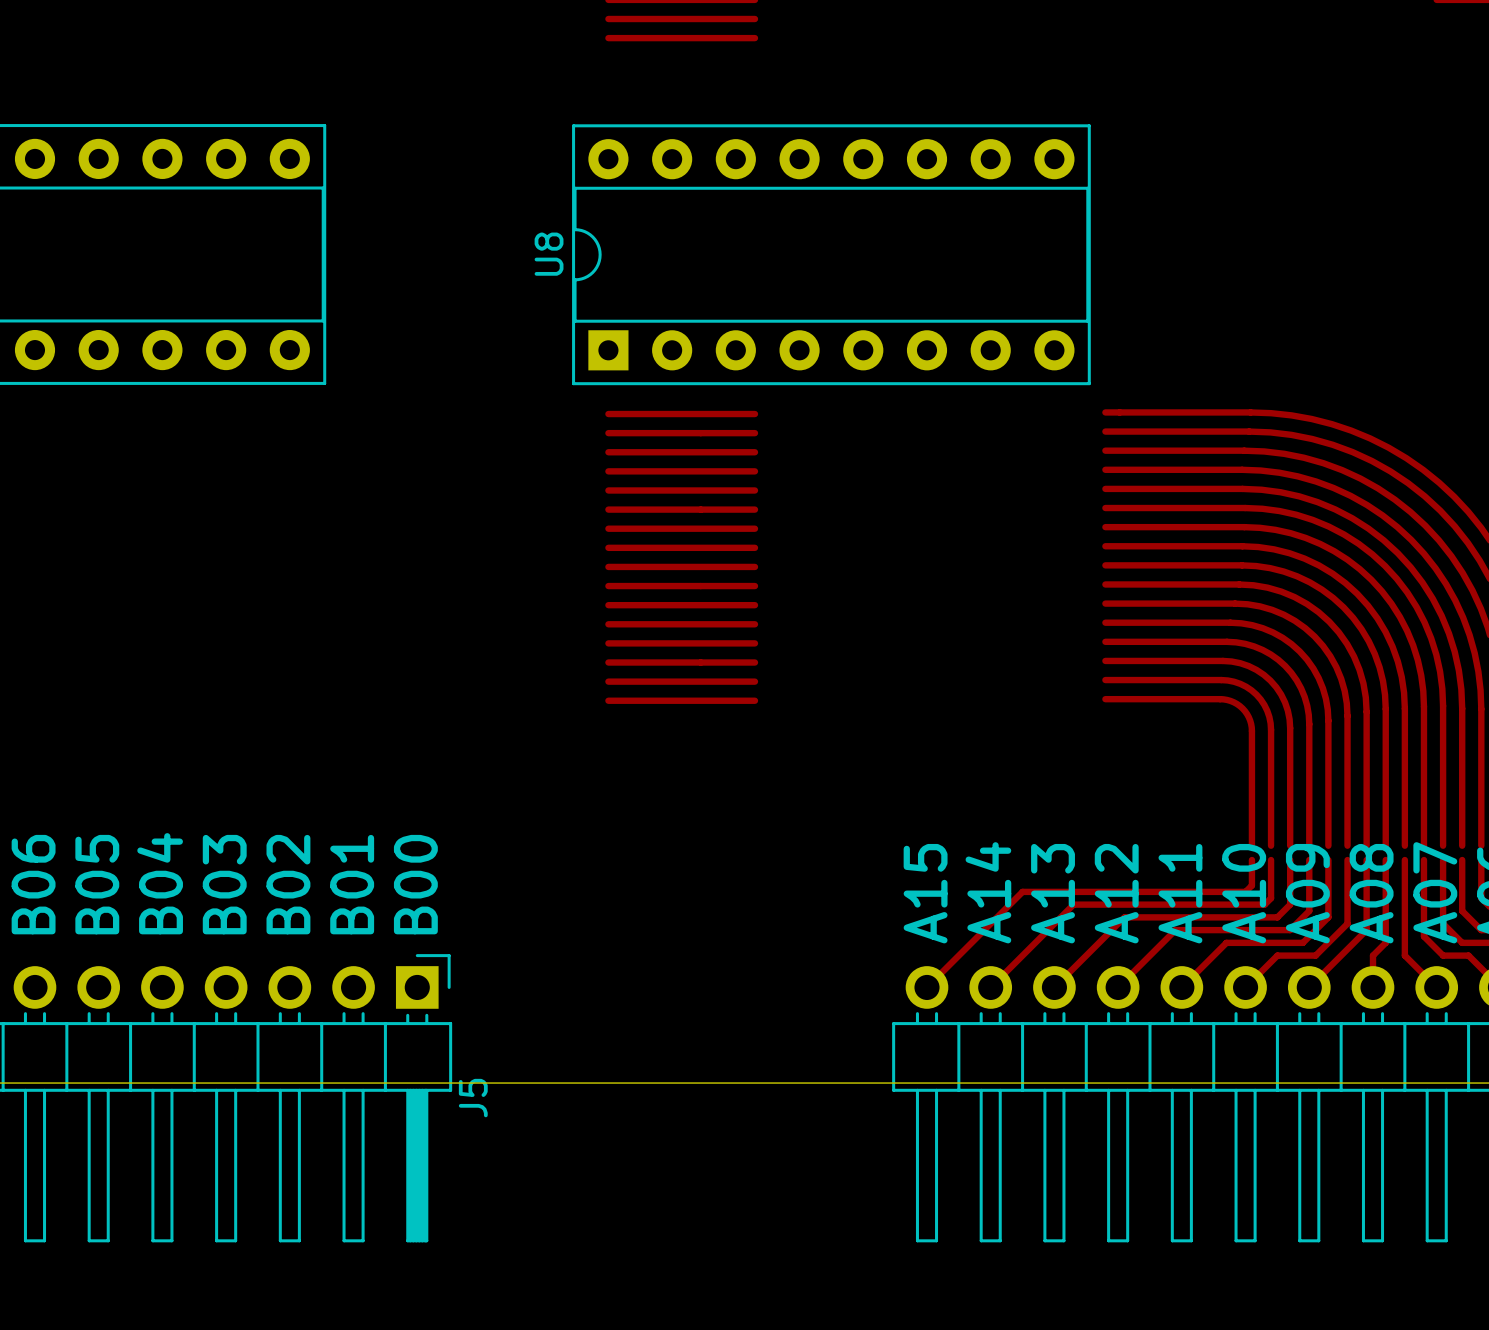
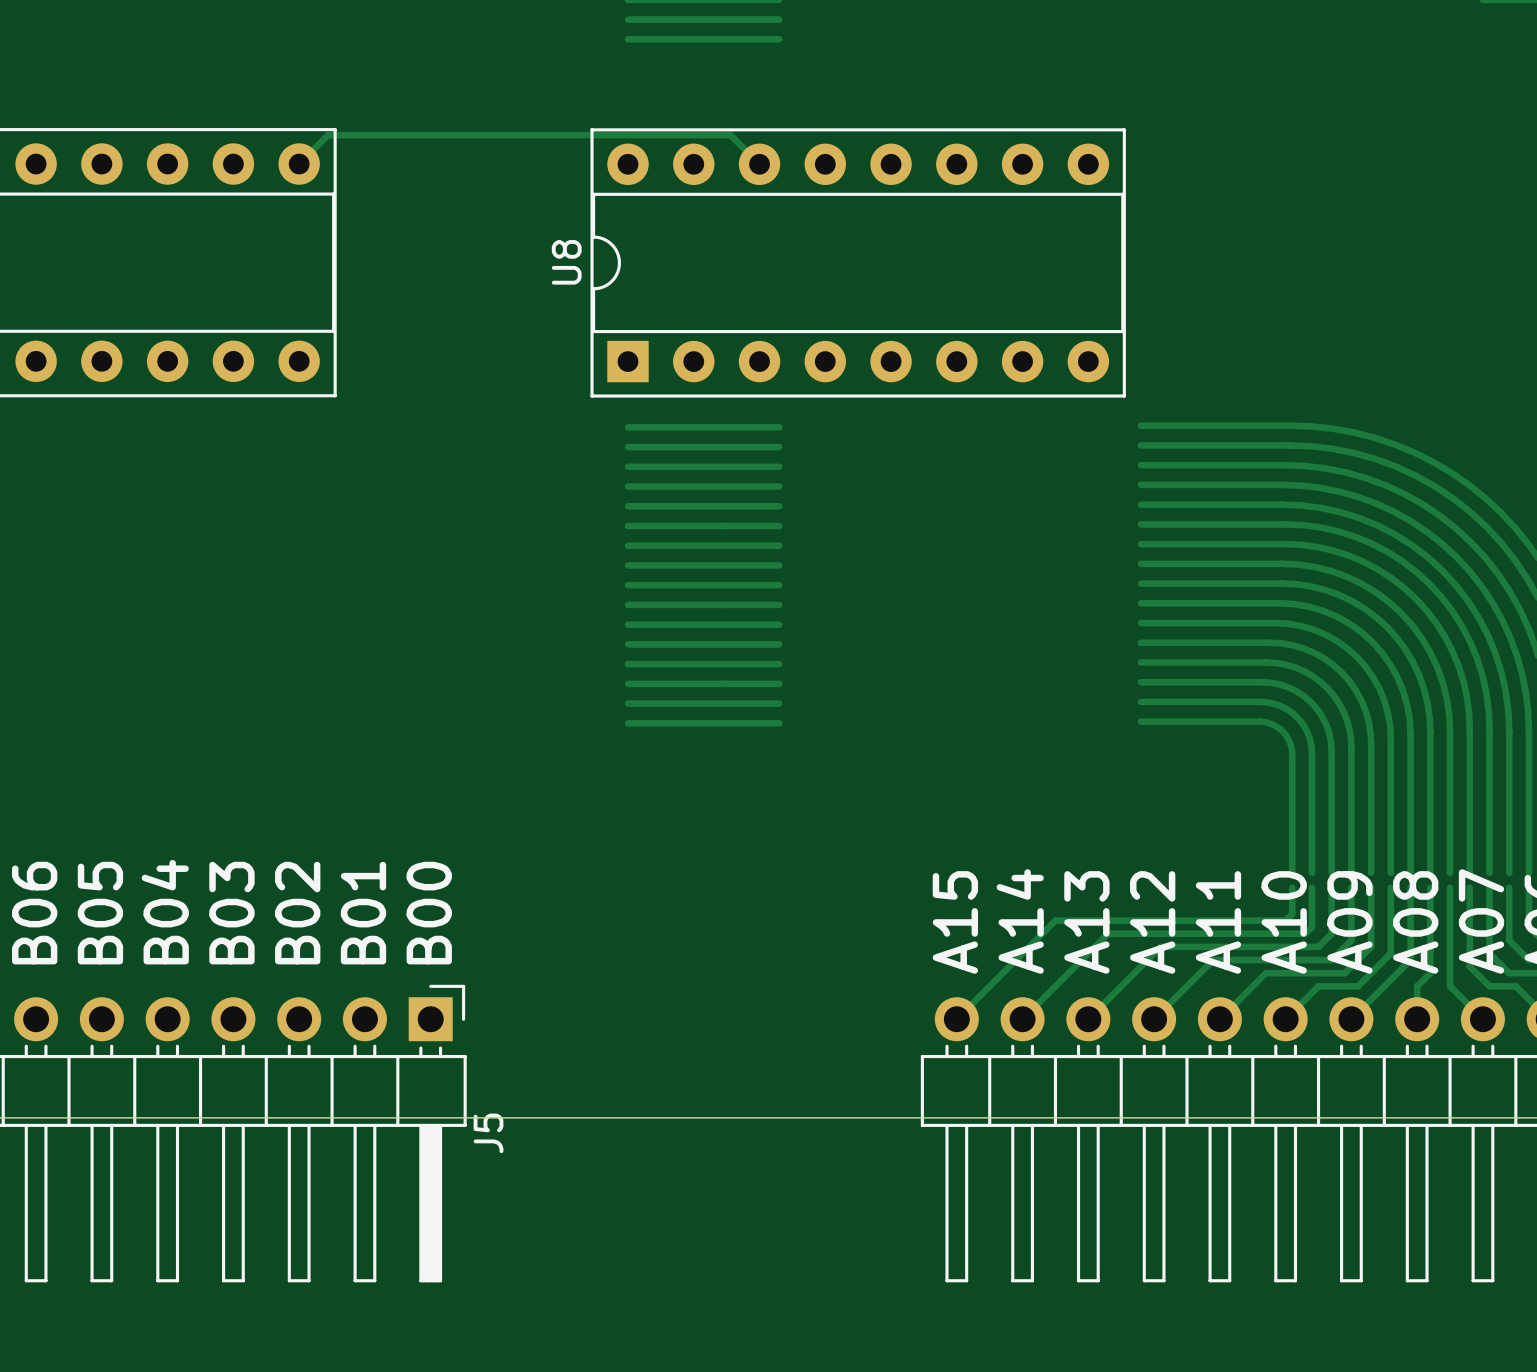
track: none -> (299, 164) (328, 135) (730, 135) (759, 164)

